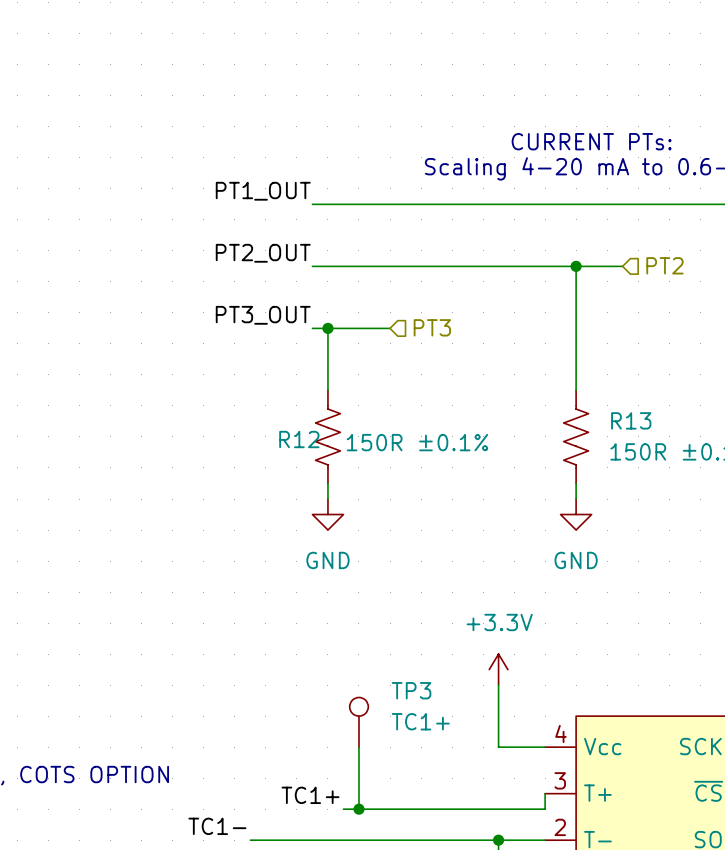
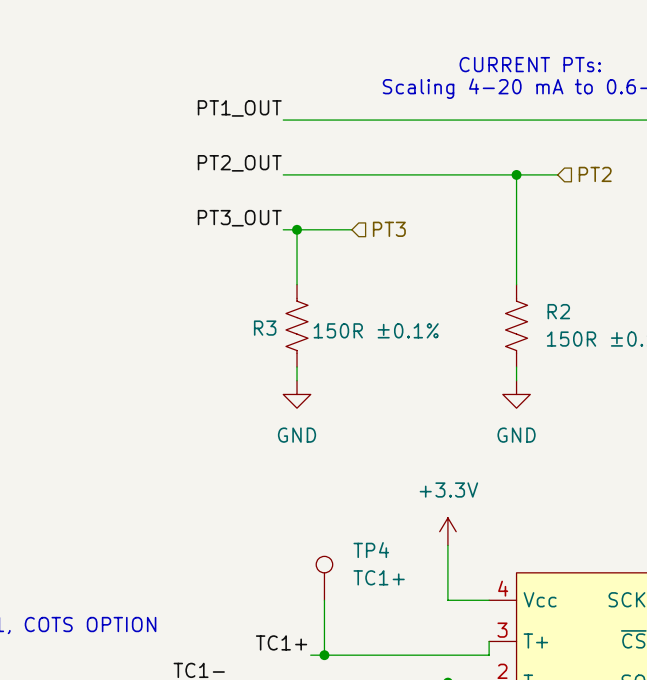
R13 name: R13 (631, 420) -> R2 (558, 311)
R12 name: R12 (299, 439) -> R3 (265, 328)
TP3 name: TP3 (411, 690) -> TP4 (371, 550)

